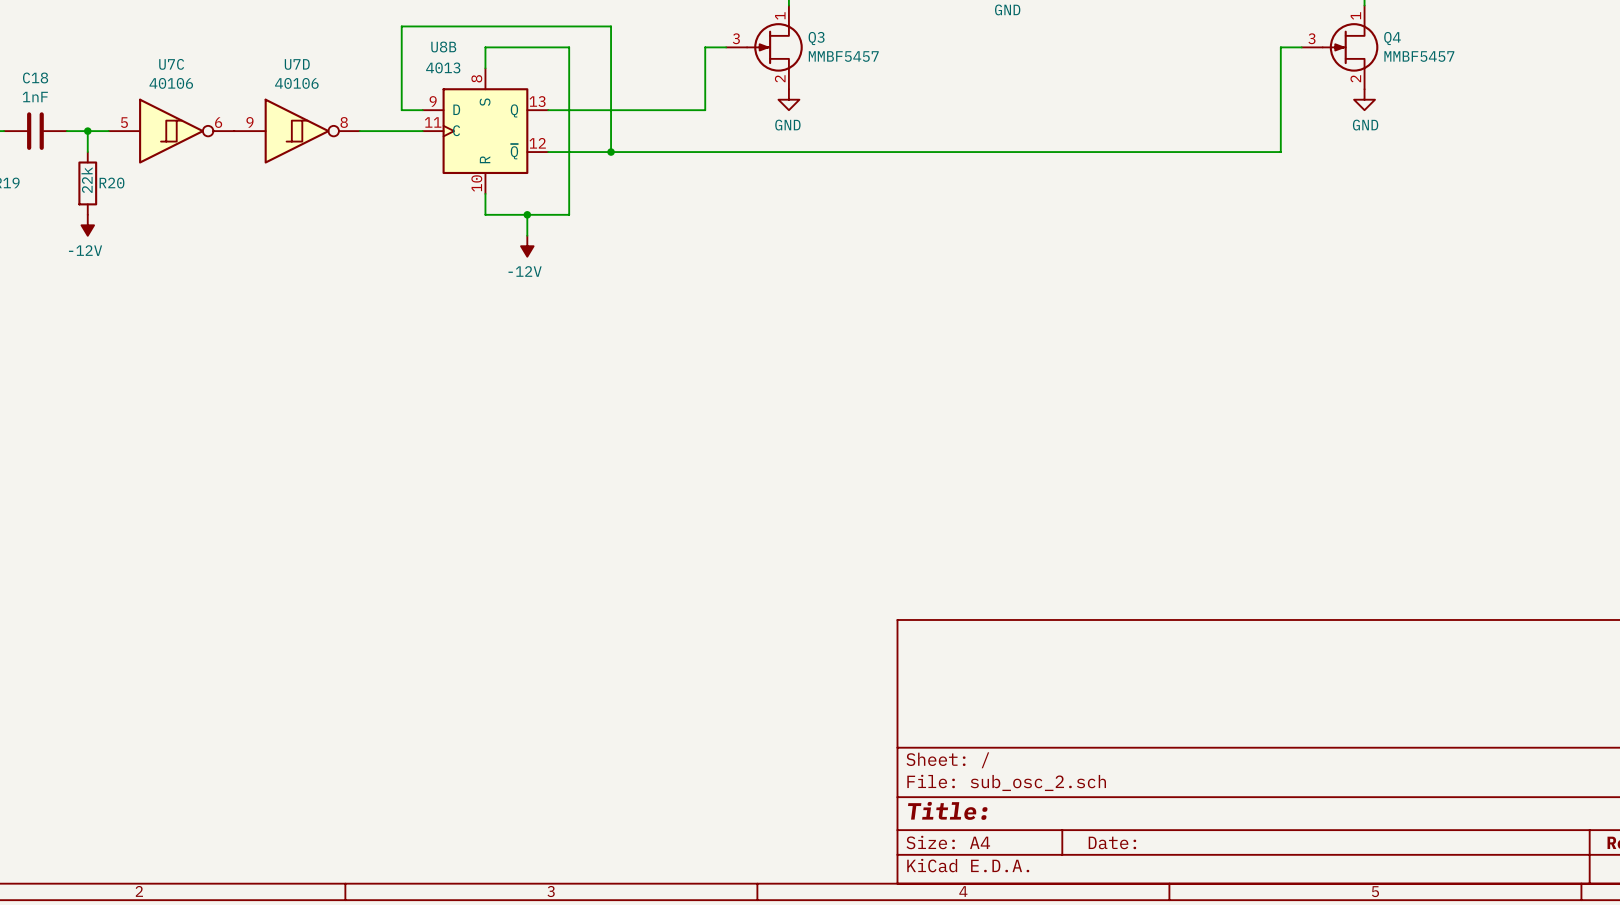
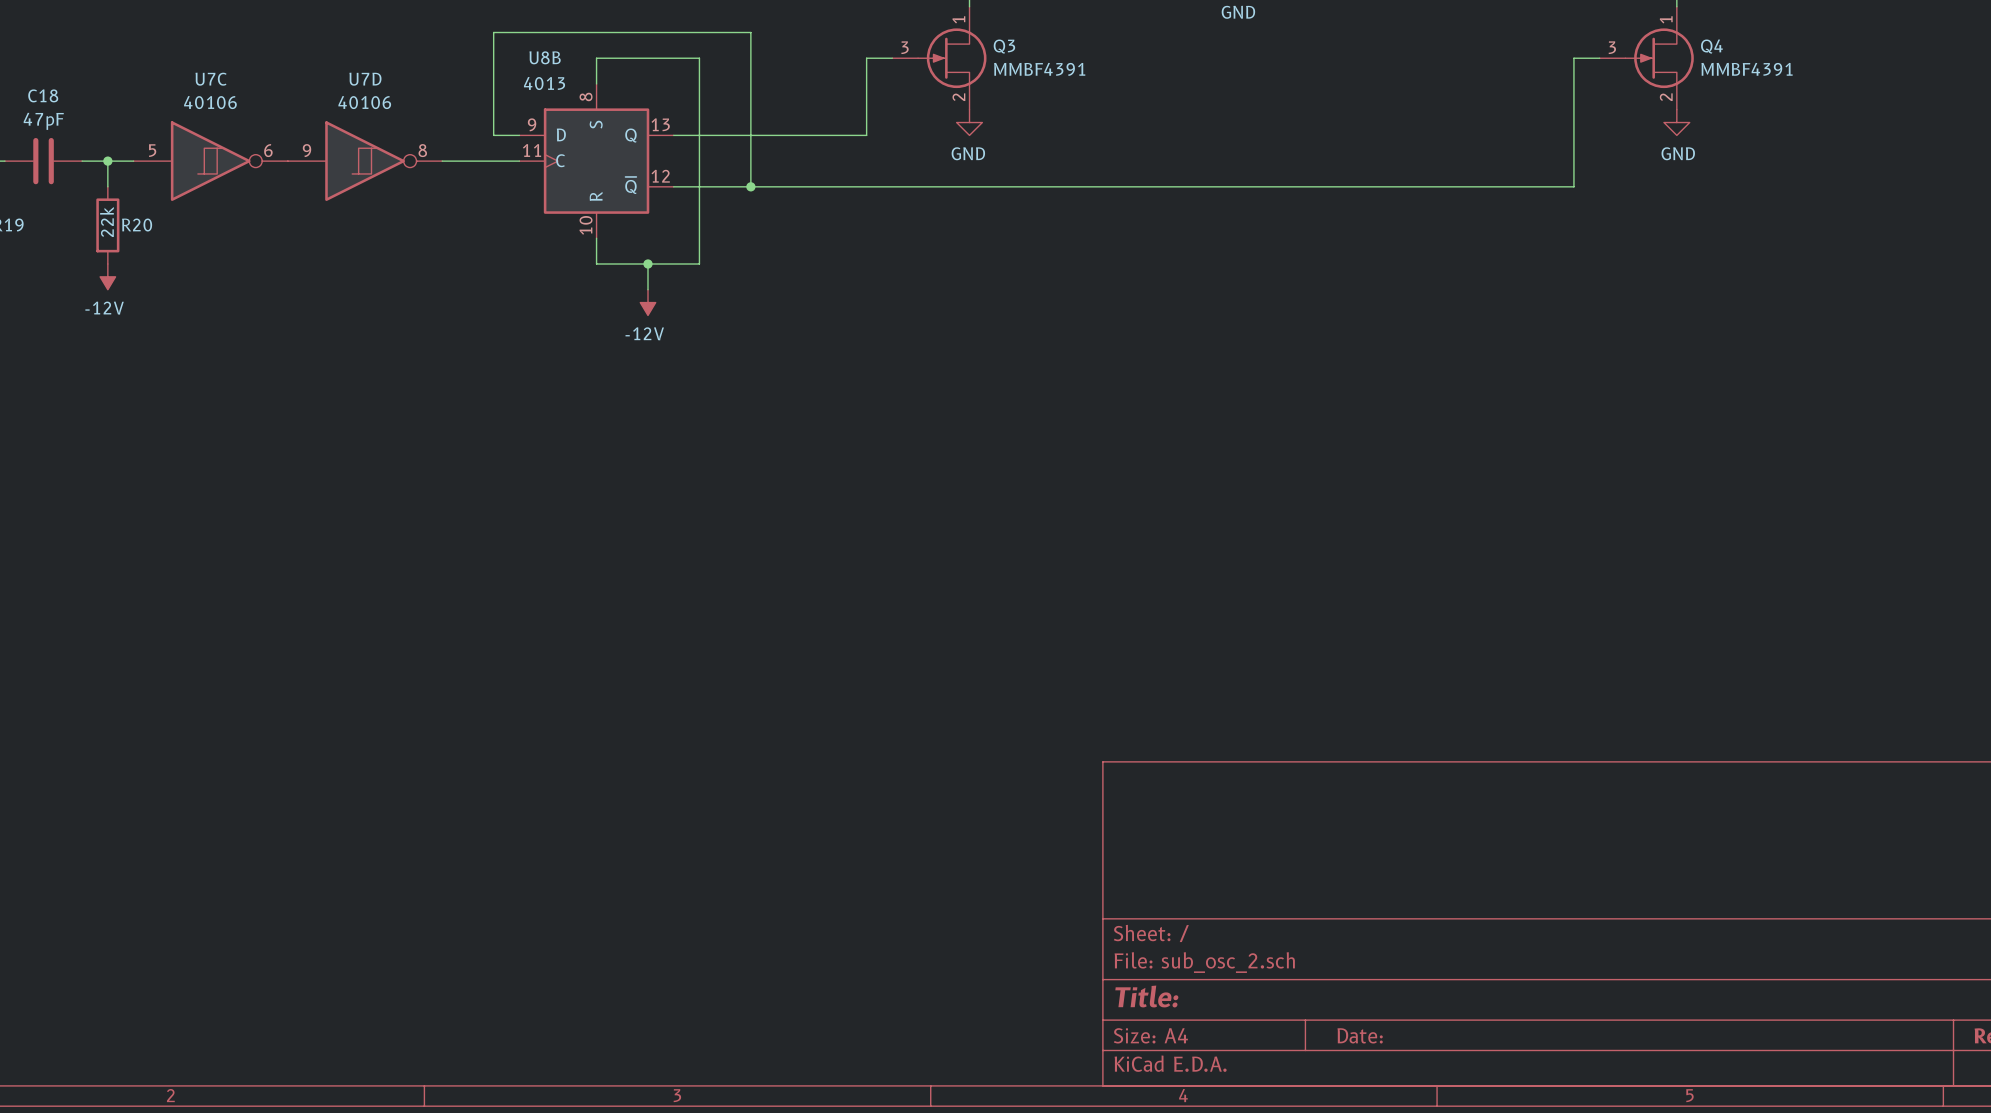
Q3 value: MMBF5457 (843, 56) -> MMBF4391 (1039, 69)
Q4 value: MMBF5457 (1419, 56) -> MMBF4391 (1747, 69)
C18 value: 1nF (35, 97) -> 47pF (43, 121)

